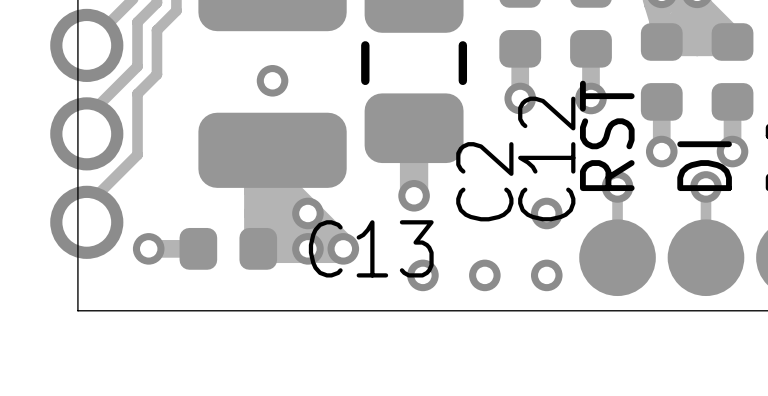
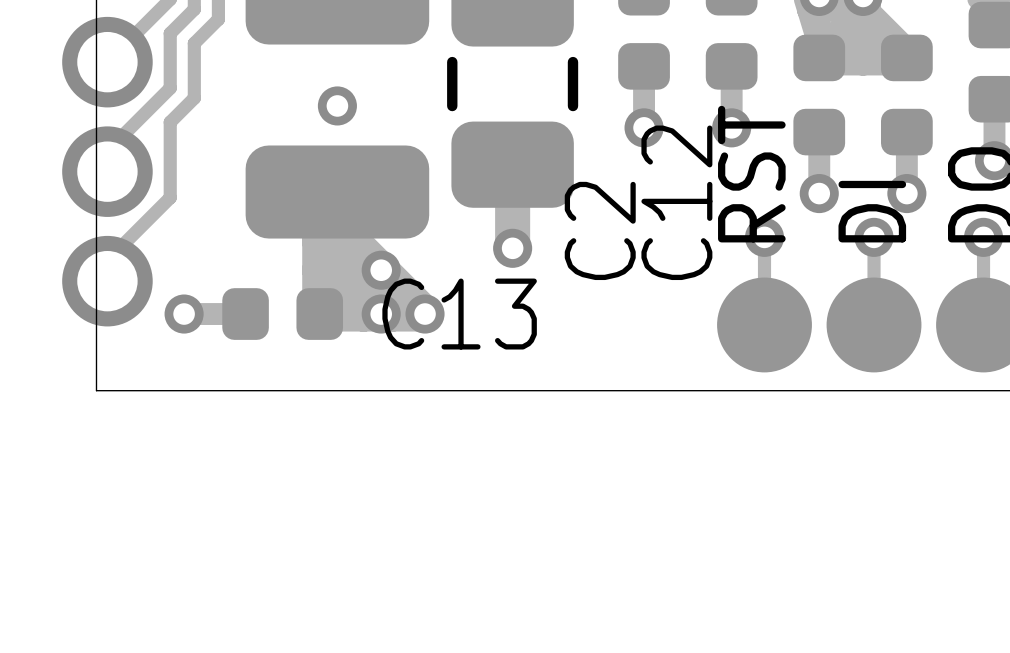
via: (546, 213) -> none
via: (422, 275) -> none
via: (484, 275) -> none
via: (546, 275) -> none

